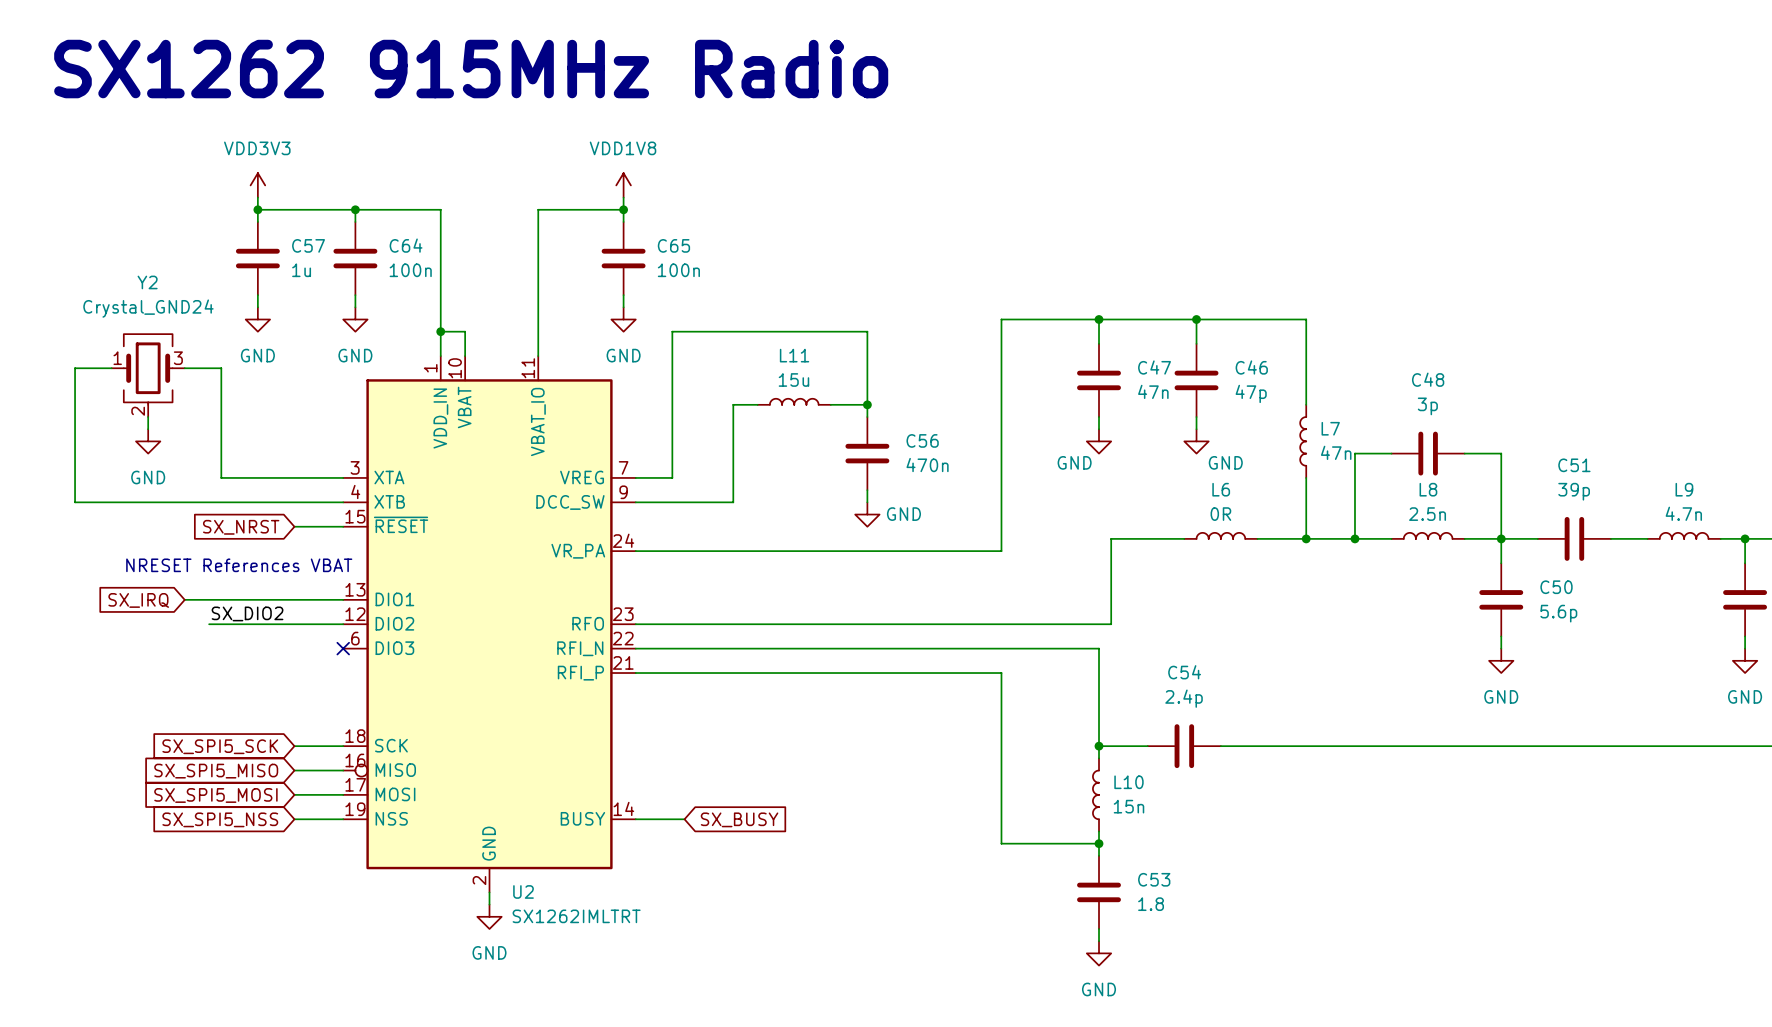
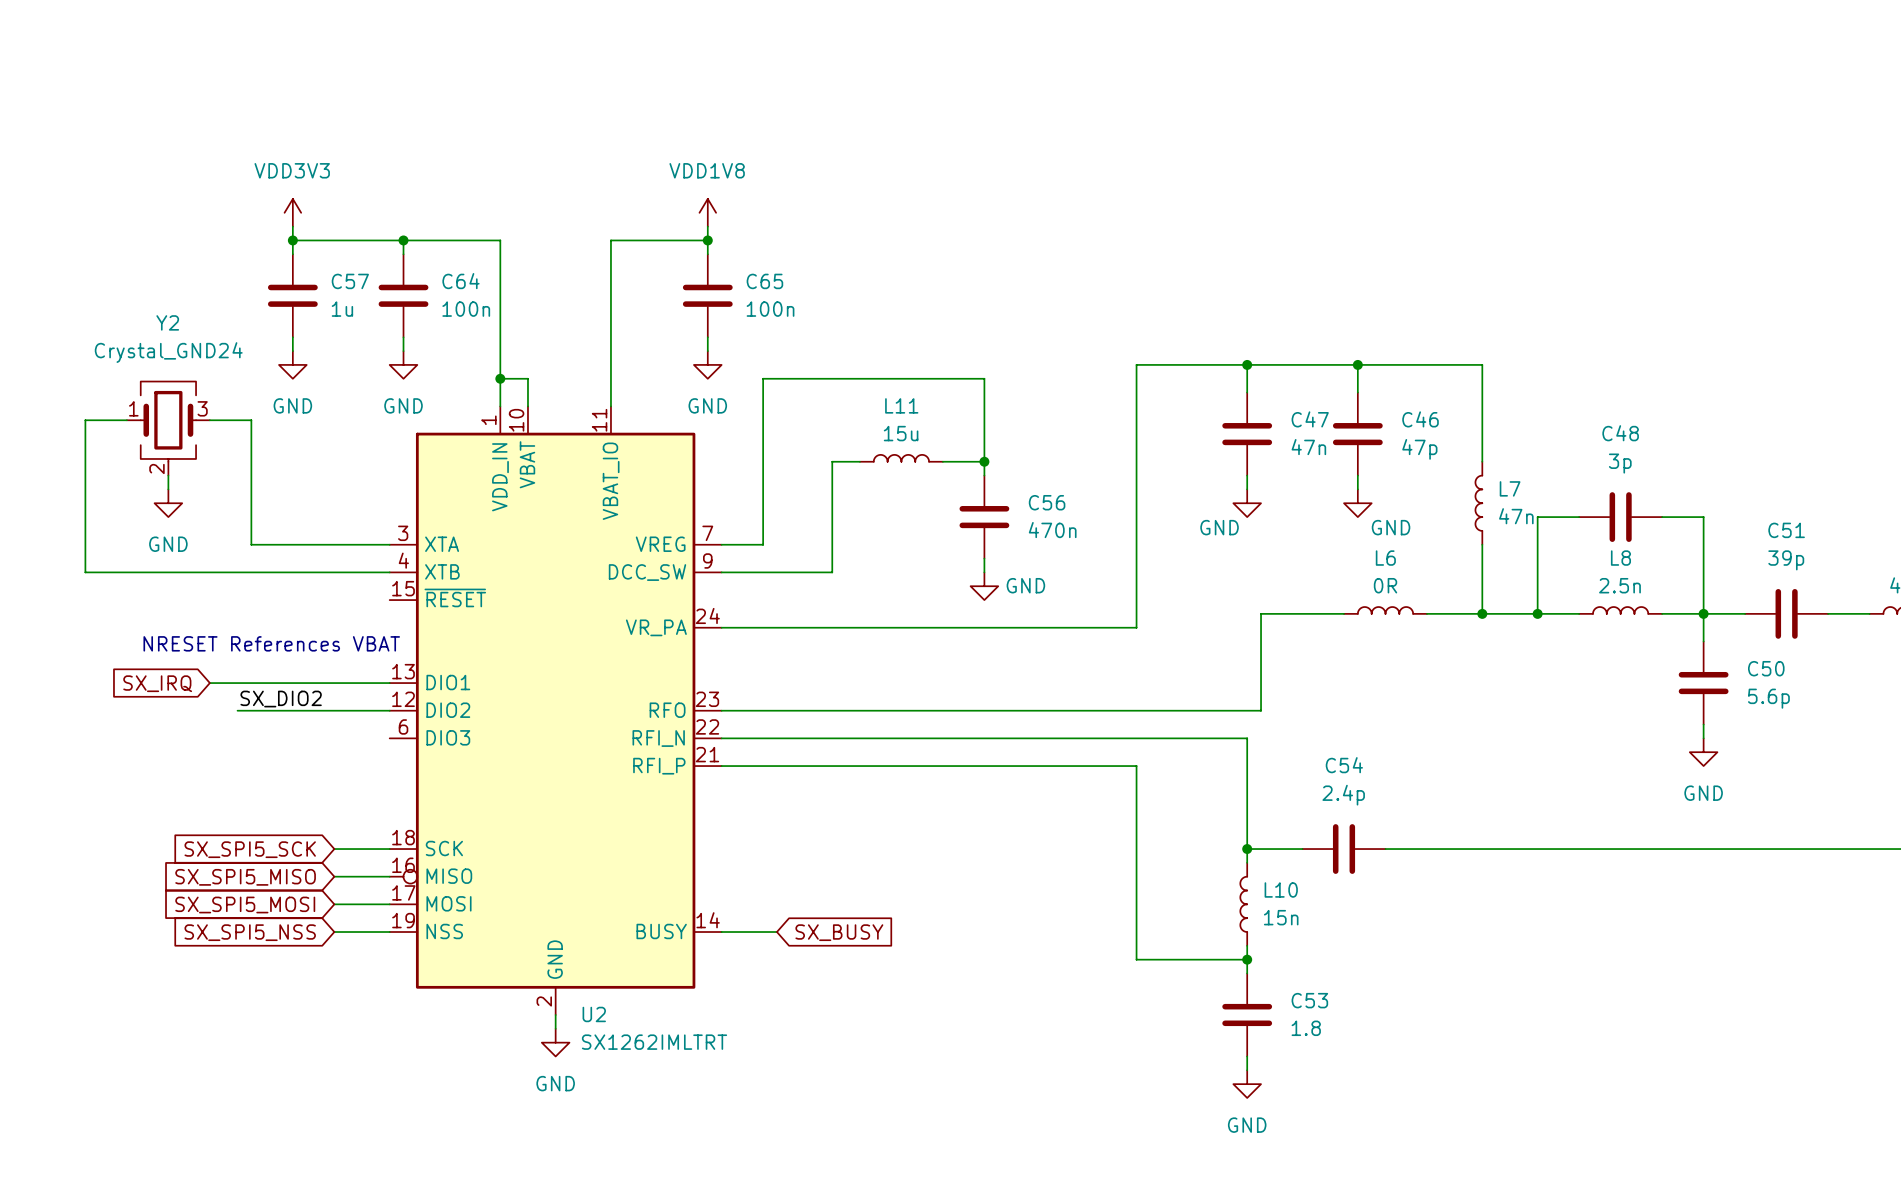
text: SX1262 915MHz Radio (471, 69) -> none
wire: (294, 526) (343, 526) -> none
global label: SX_NRST (241, 527) -> none
no-connect mark: (343, 648) -> none

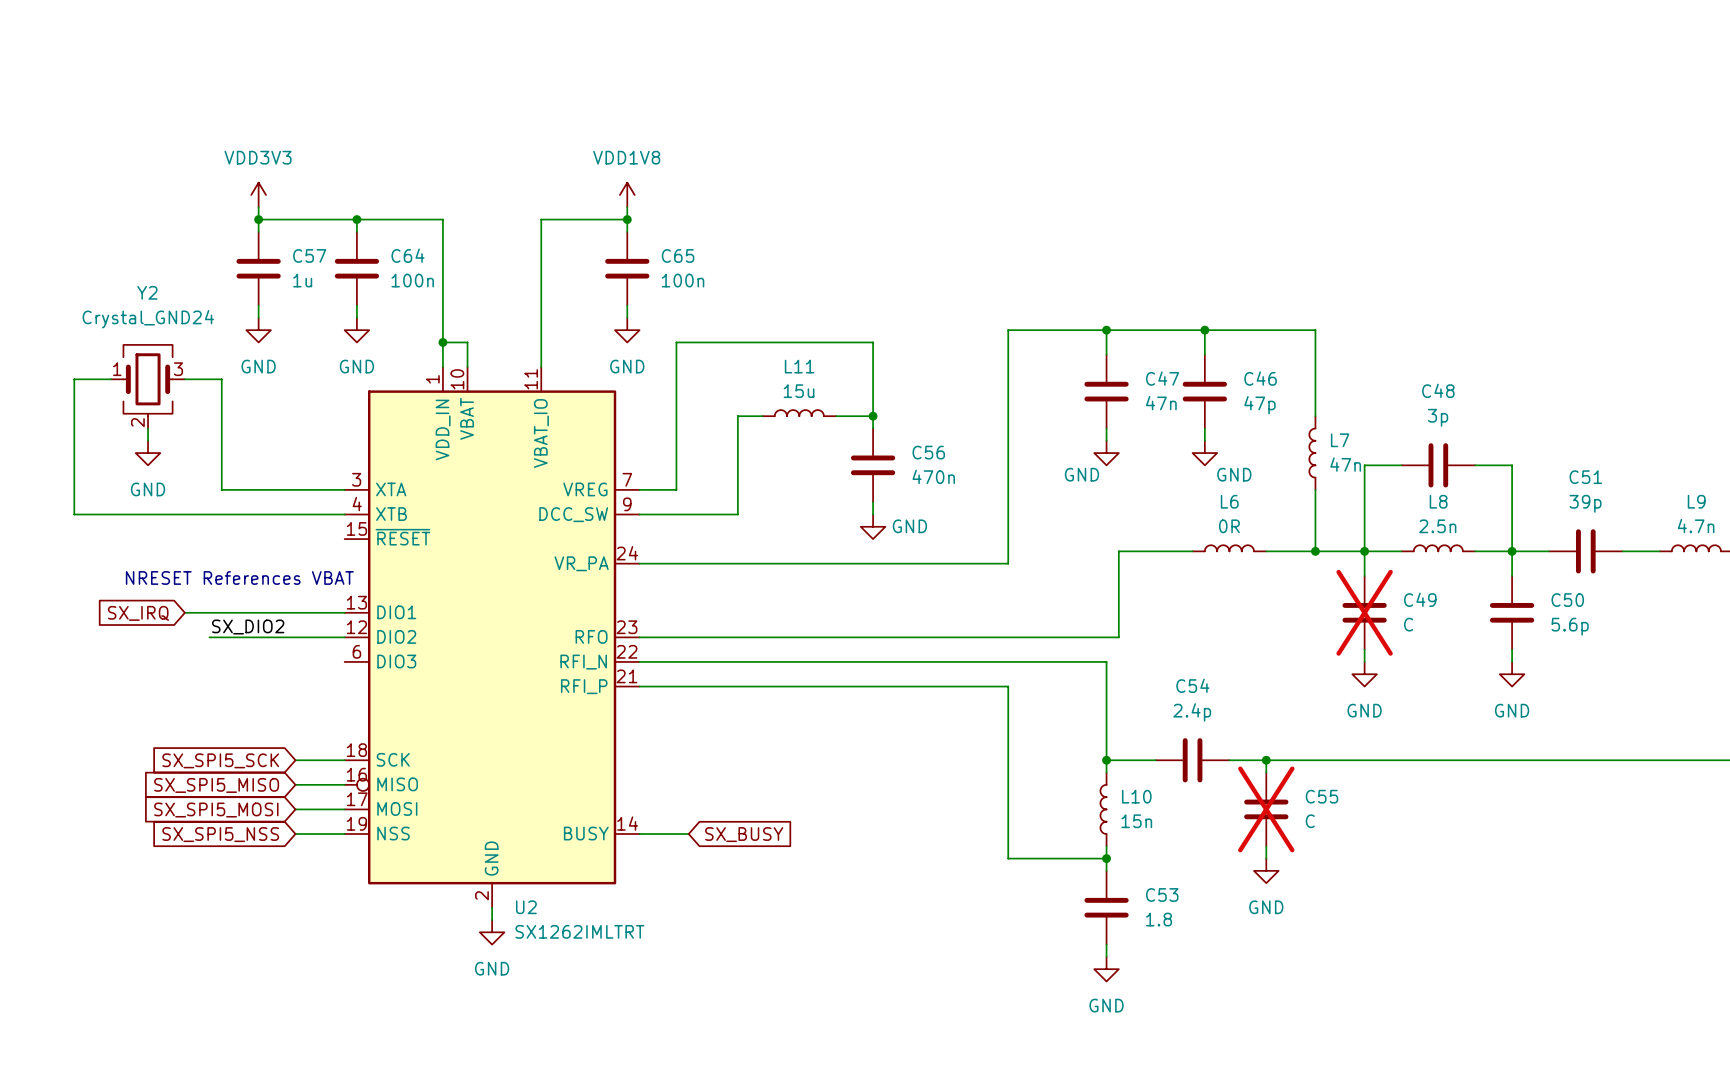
wire: none -> (1364, 551) (1364, 575)
C49: none -> C (1364, 612)
wire: none -> (1364, 649) (1364, 661)
power symbol: none -> GND (1364, 674)
wire: none -> (1266, 760) (1266, 772)
junction: none -> (1266, 760)
C55: none -> C (1266, 809)
wire: none -> (1266, 846) (1266, 858)
power symbol: none -> GND (1266, 870)

